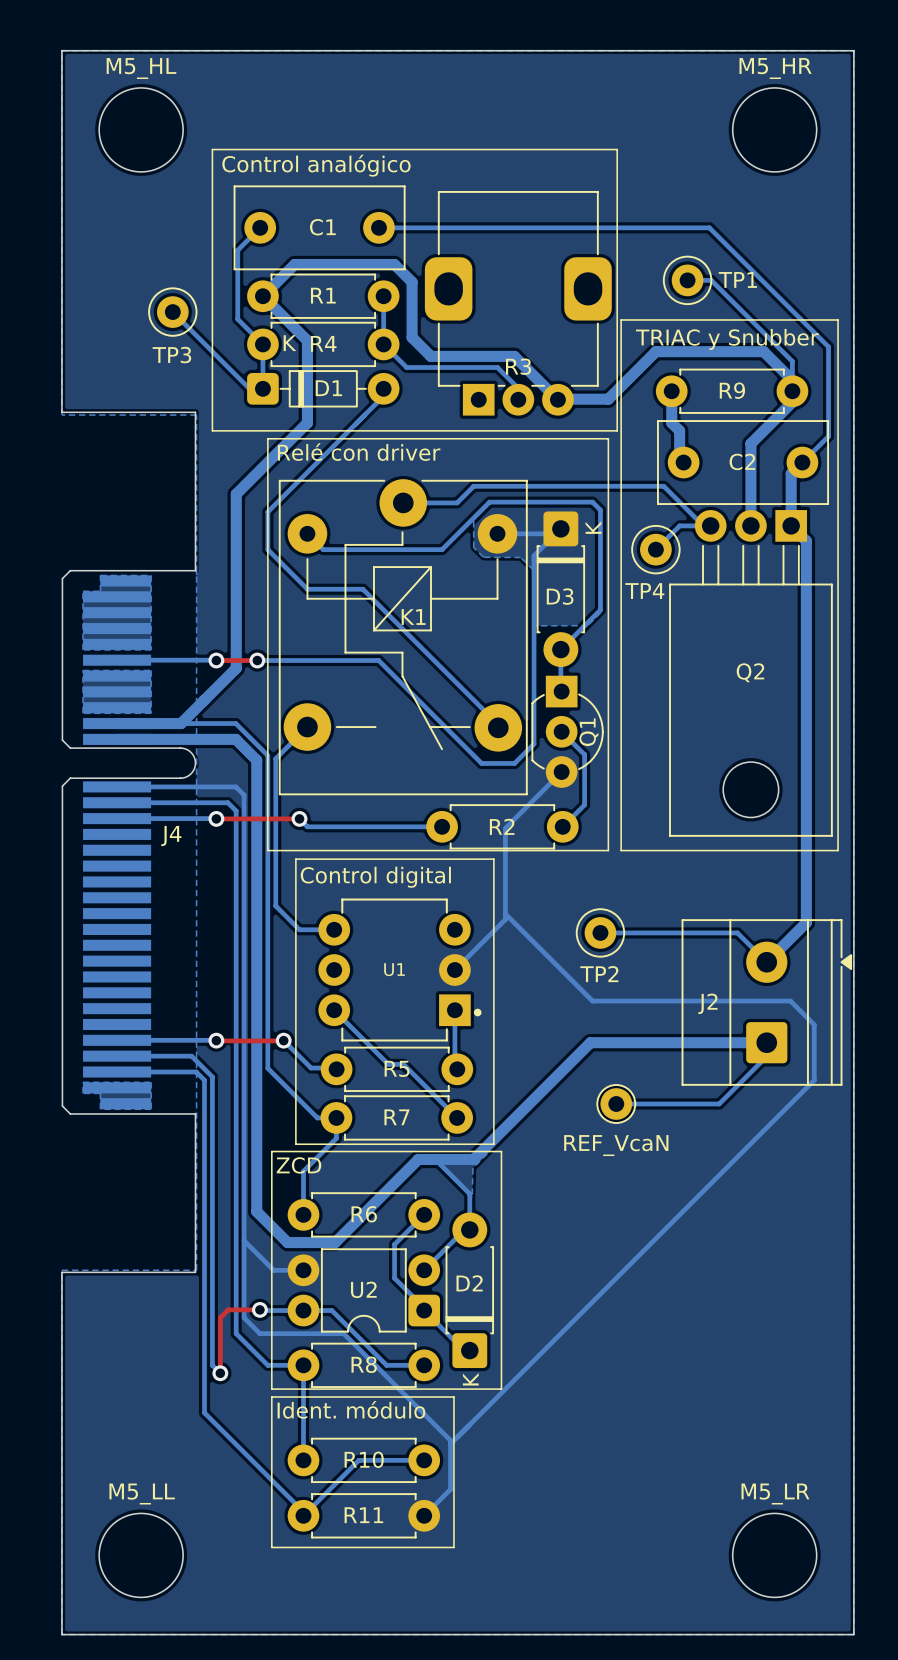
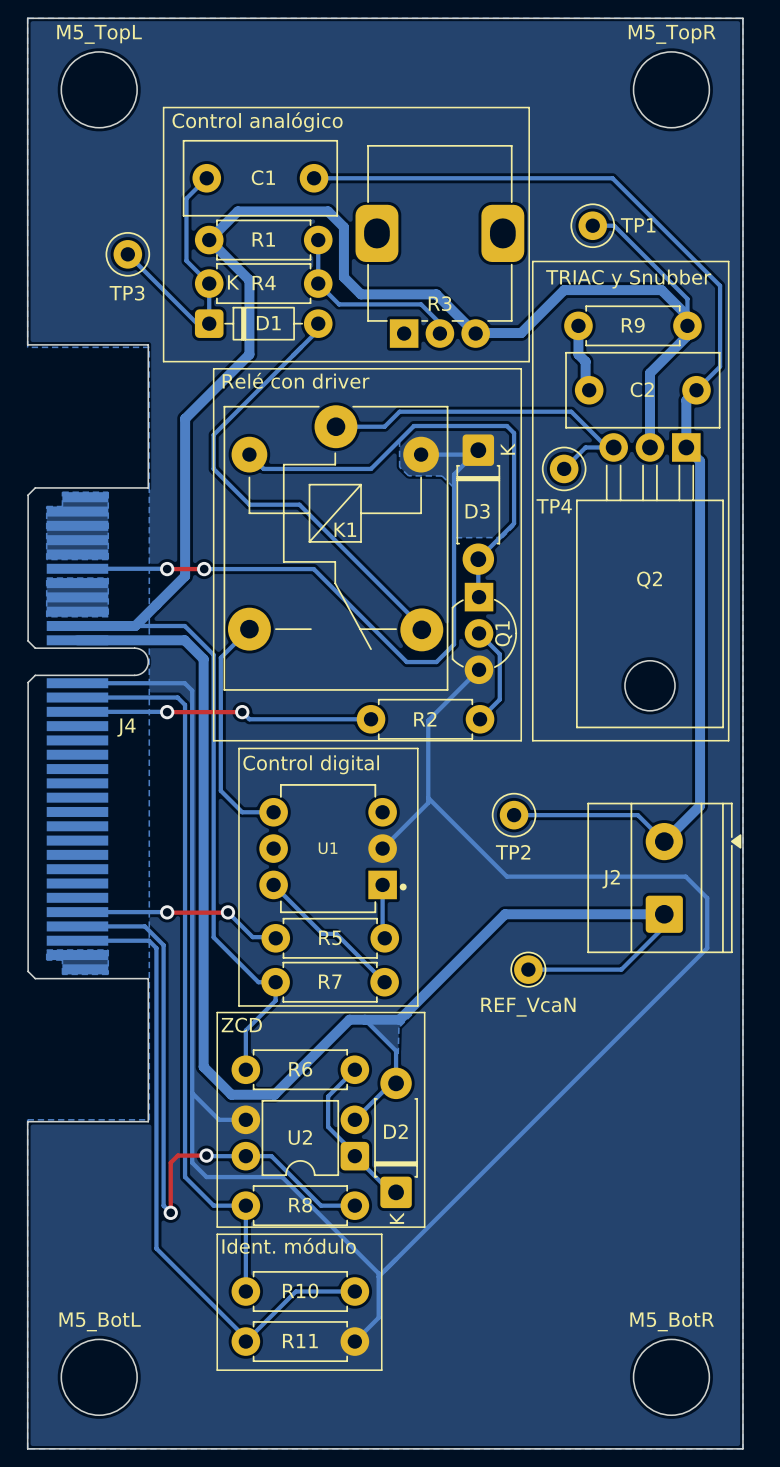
M5_HL name: M5_HL (141, 68) -> M5_TopL (99, 34)
M5_HR name: M5_HR (775, 68) -> M5_TopR (672, 34)
M5_LL name: M5_LL (142, 1494) -> M5_BotL (100, 1321)
M5_LR name: M5_LR (775, 1494) -> M5_BotR (672, 1321)

